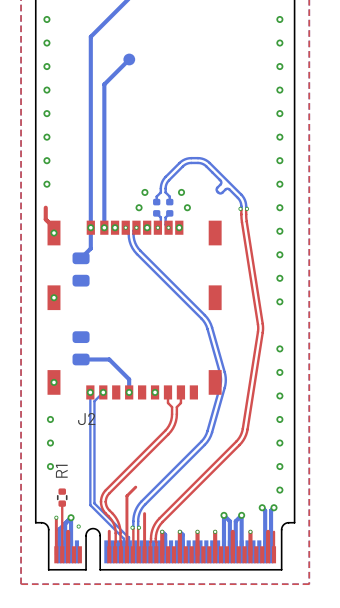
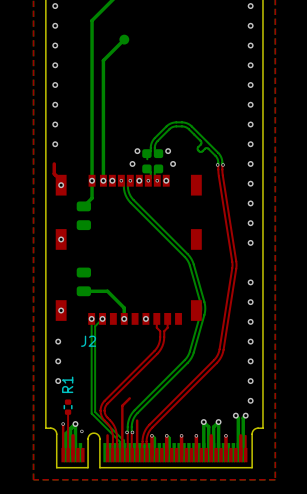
bottom track: (165, 192) (169, 196) (169, 202) -> none
part footprint: [153, 198, 161, 217] -> [142, 149, 152, 174]
part footprint: [166, 198, 174, 217] -> [153, 149, 164, 174]

